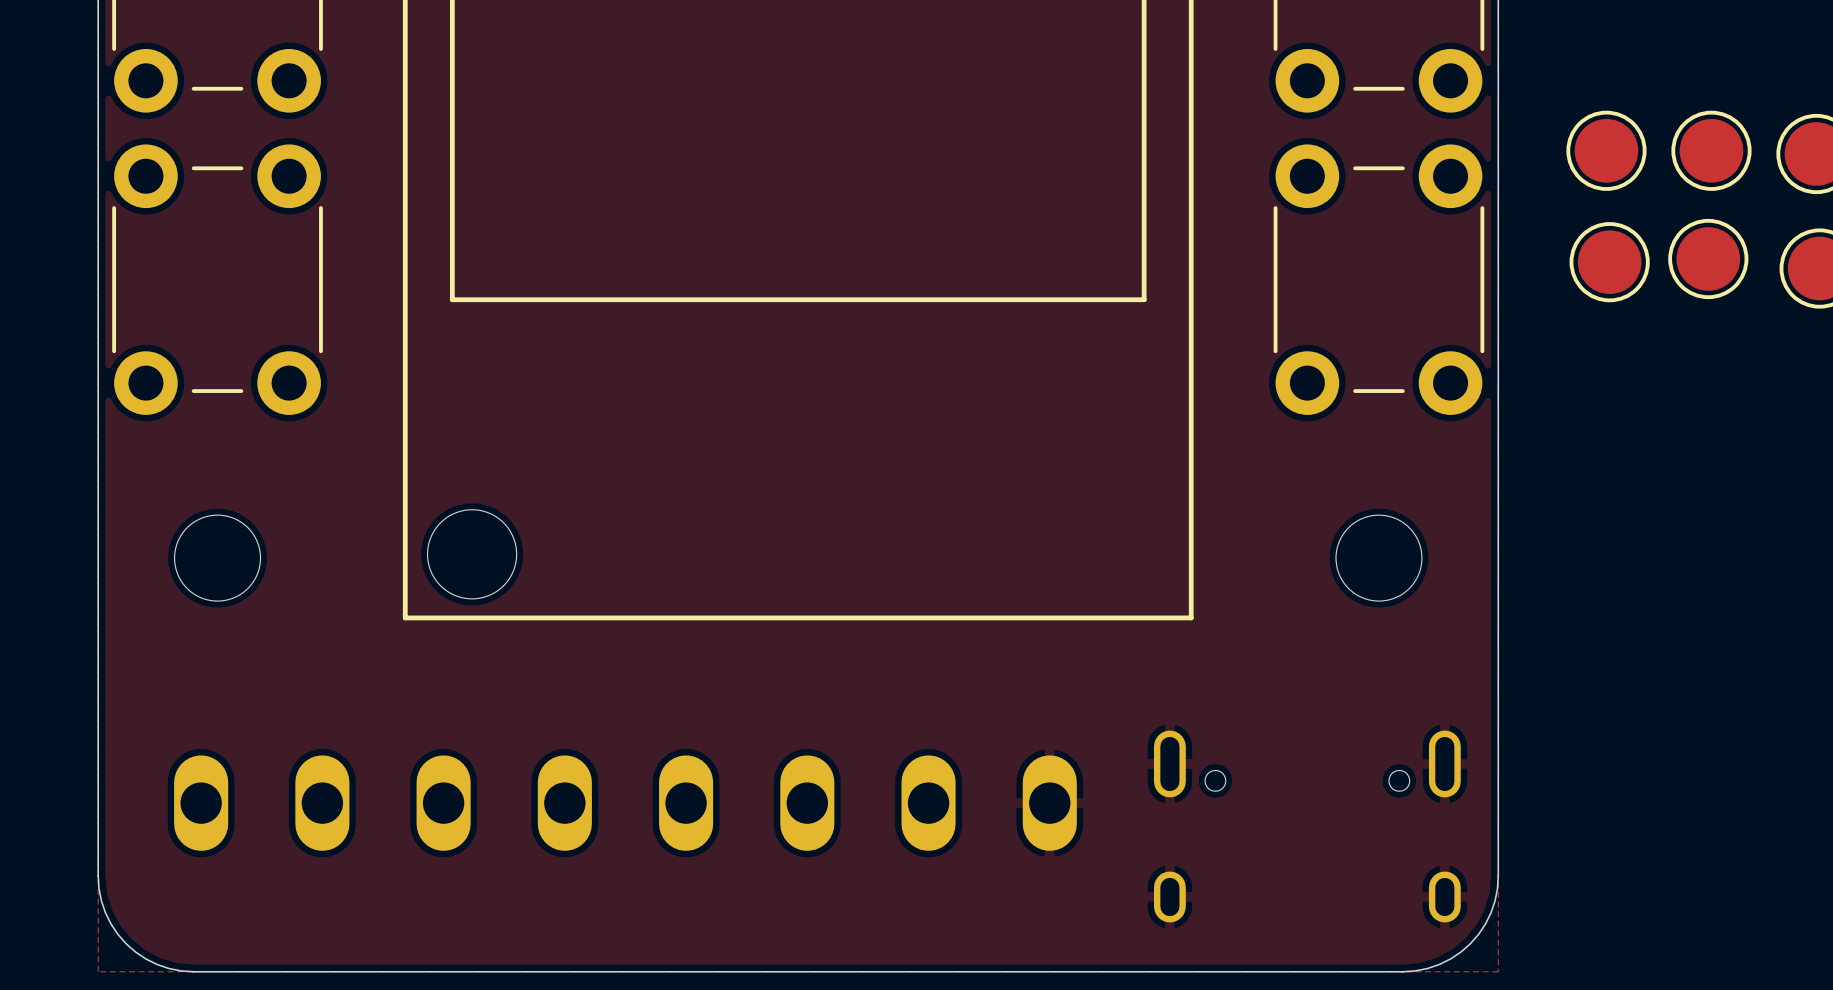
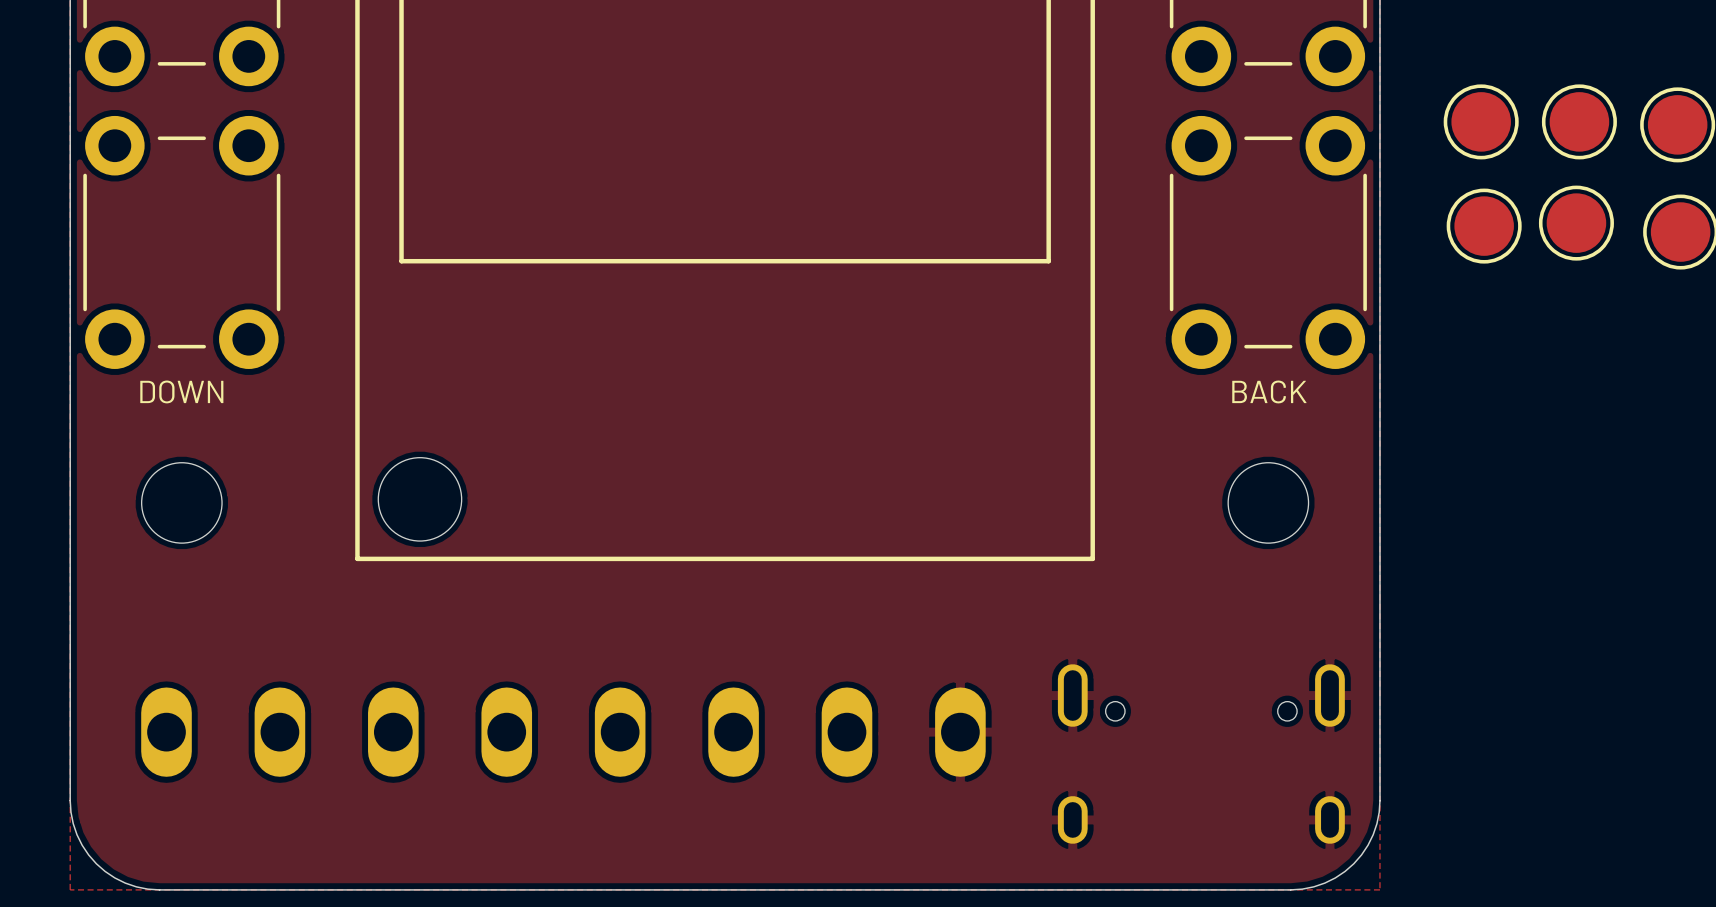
text: none -> DOWN (181, 391)
text: none -> BACK (1269, 391)

